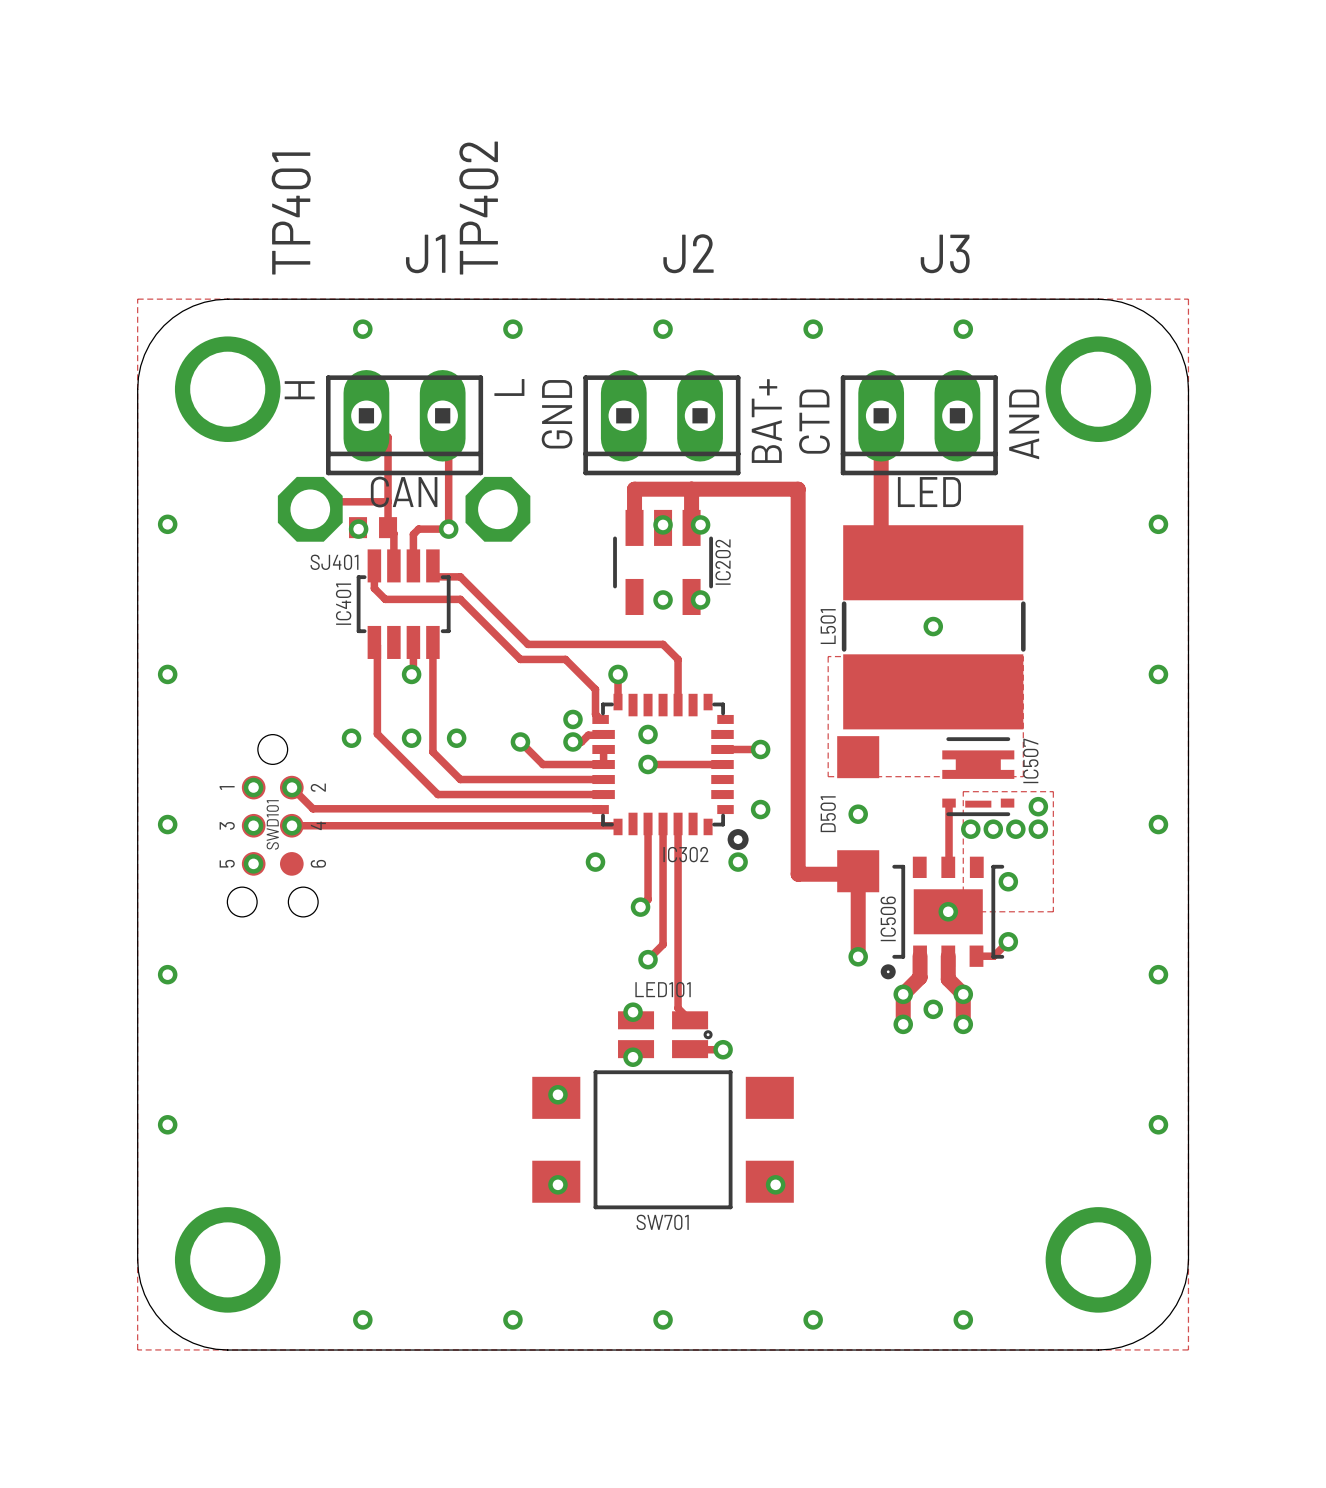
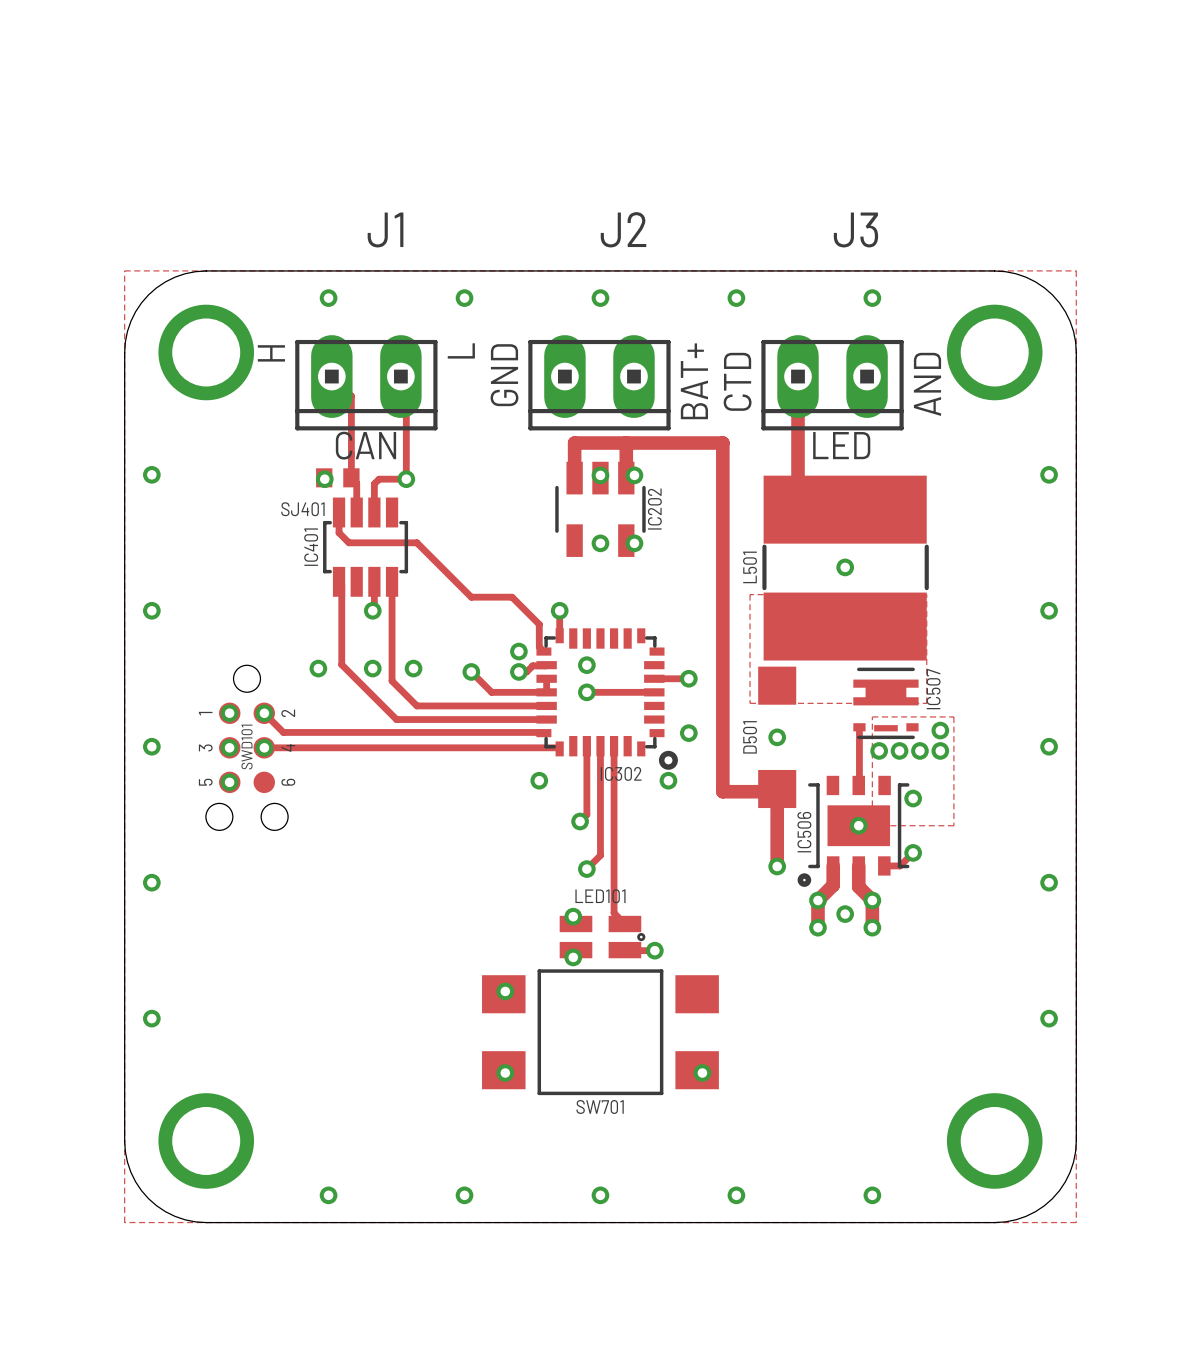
track: (388, 501) (317, 501) (310, 509) -> none
TP401: (310, 509) -> none
TP402: (497, 509) -> none
track: (432, 565) (432, 576) (460, 576) (527, 644) (663, 644) (678, 659) (678, 705) -> none

